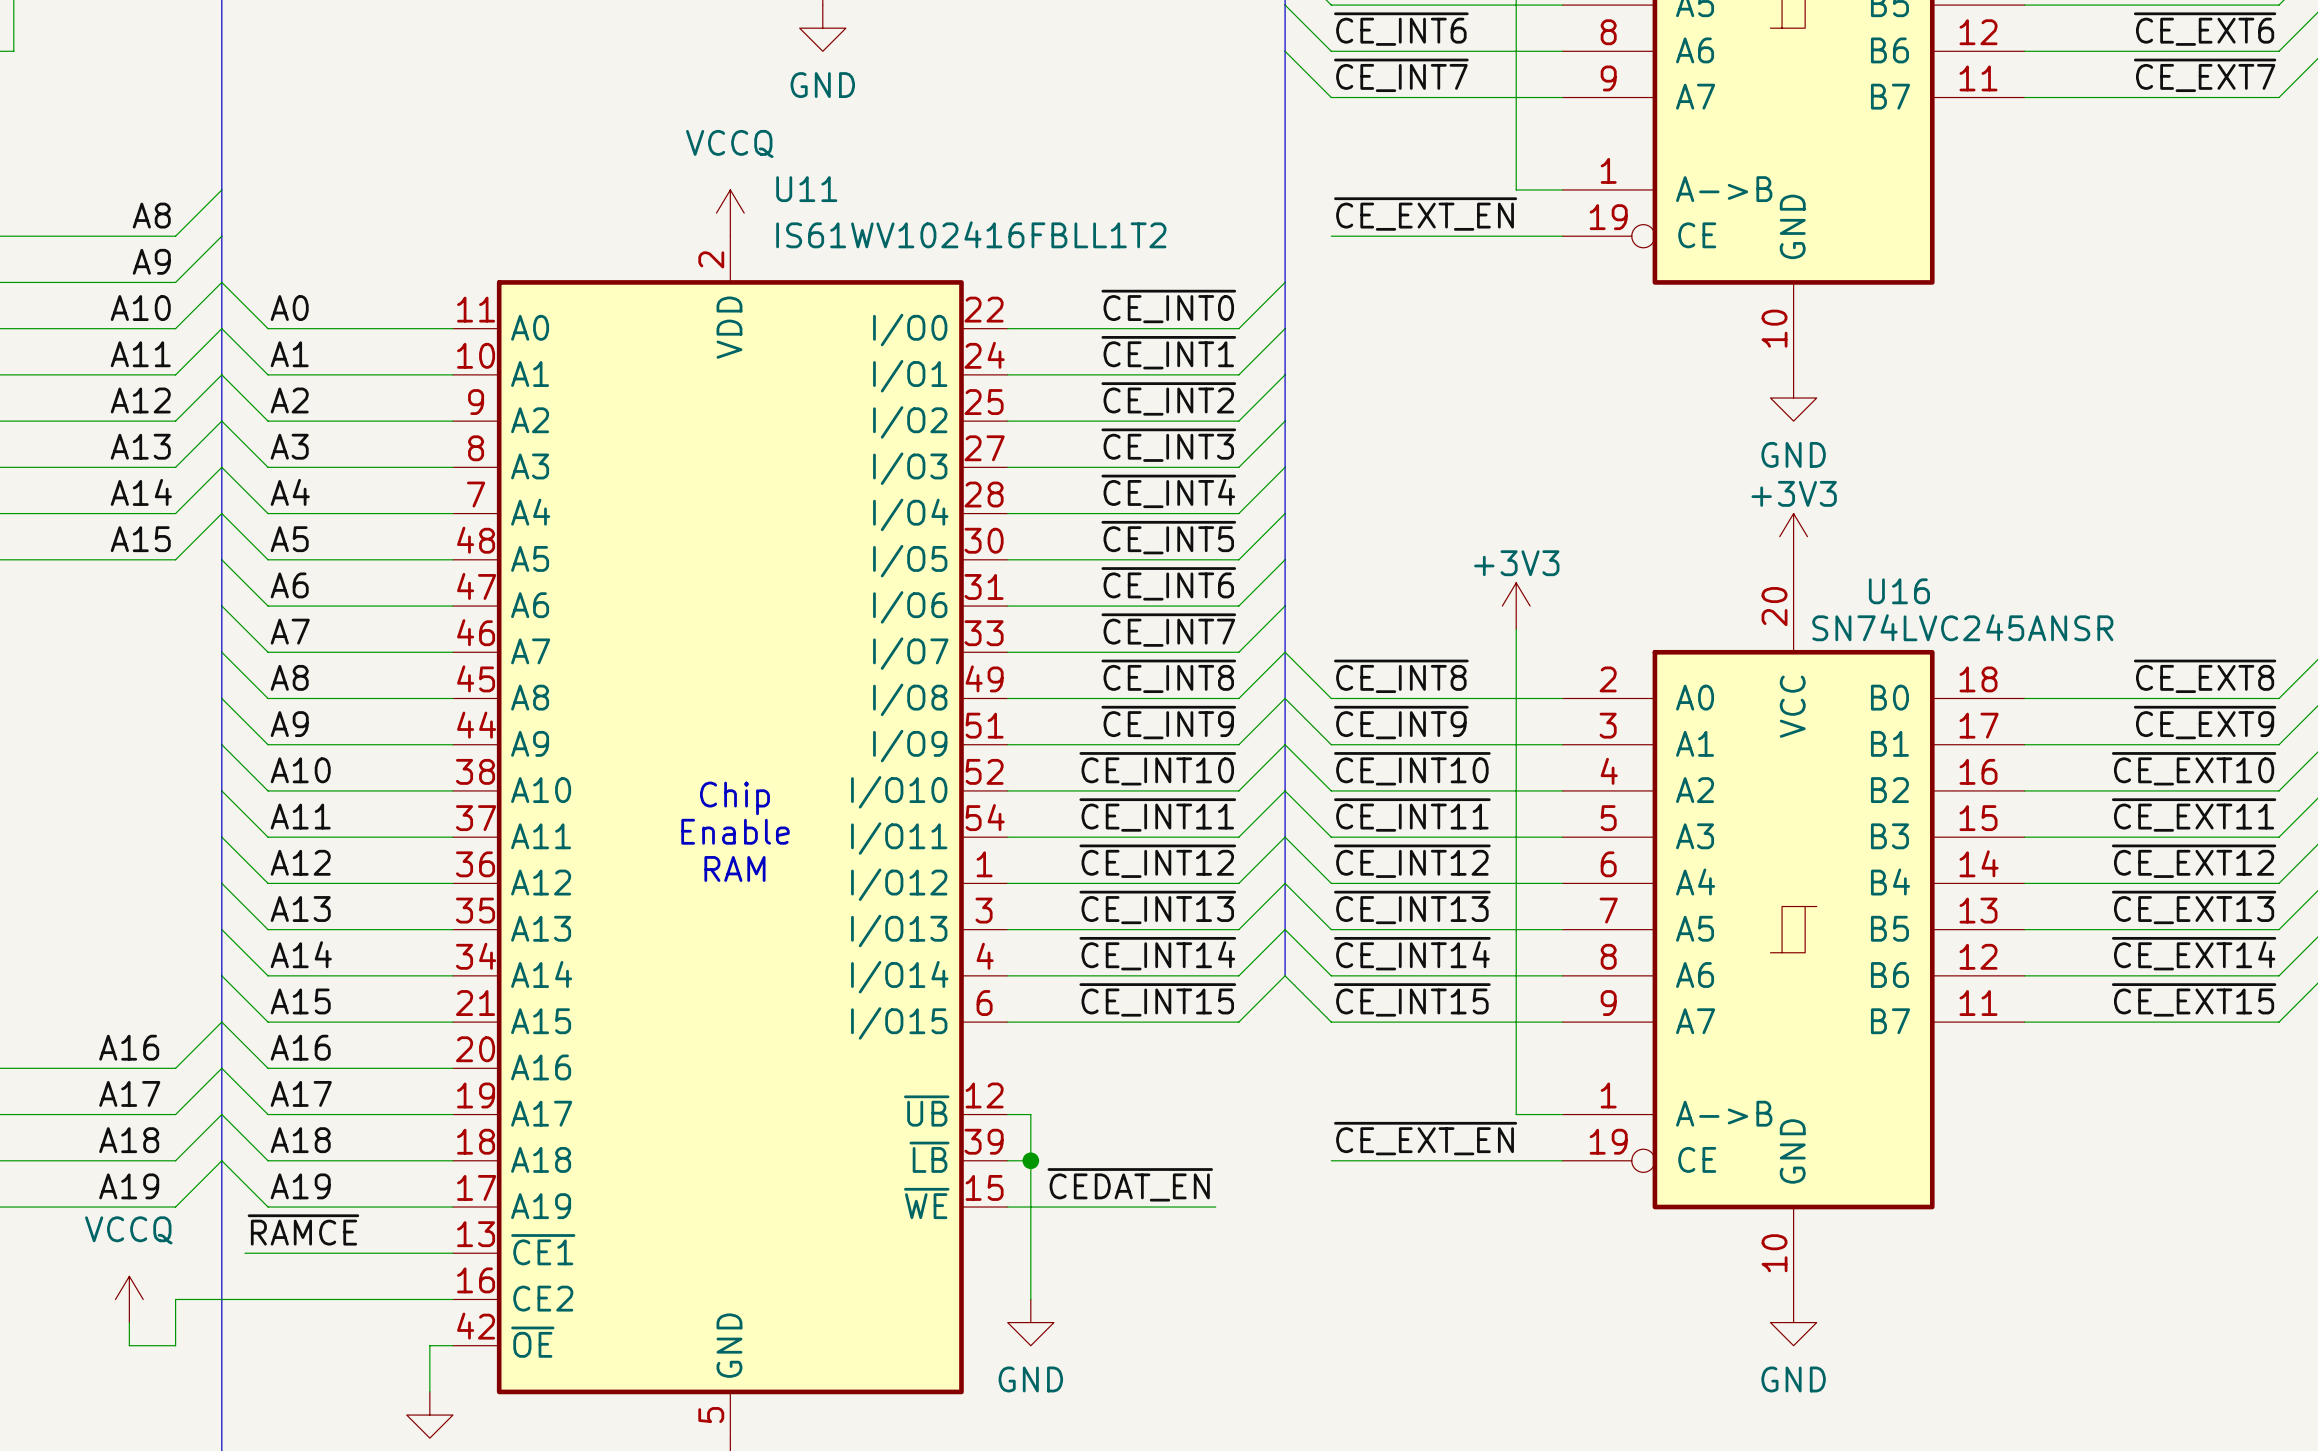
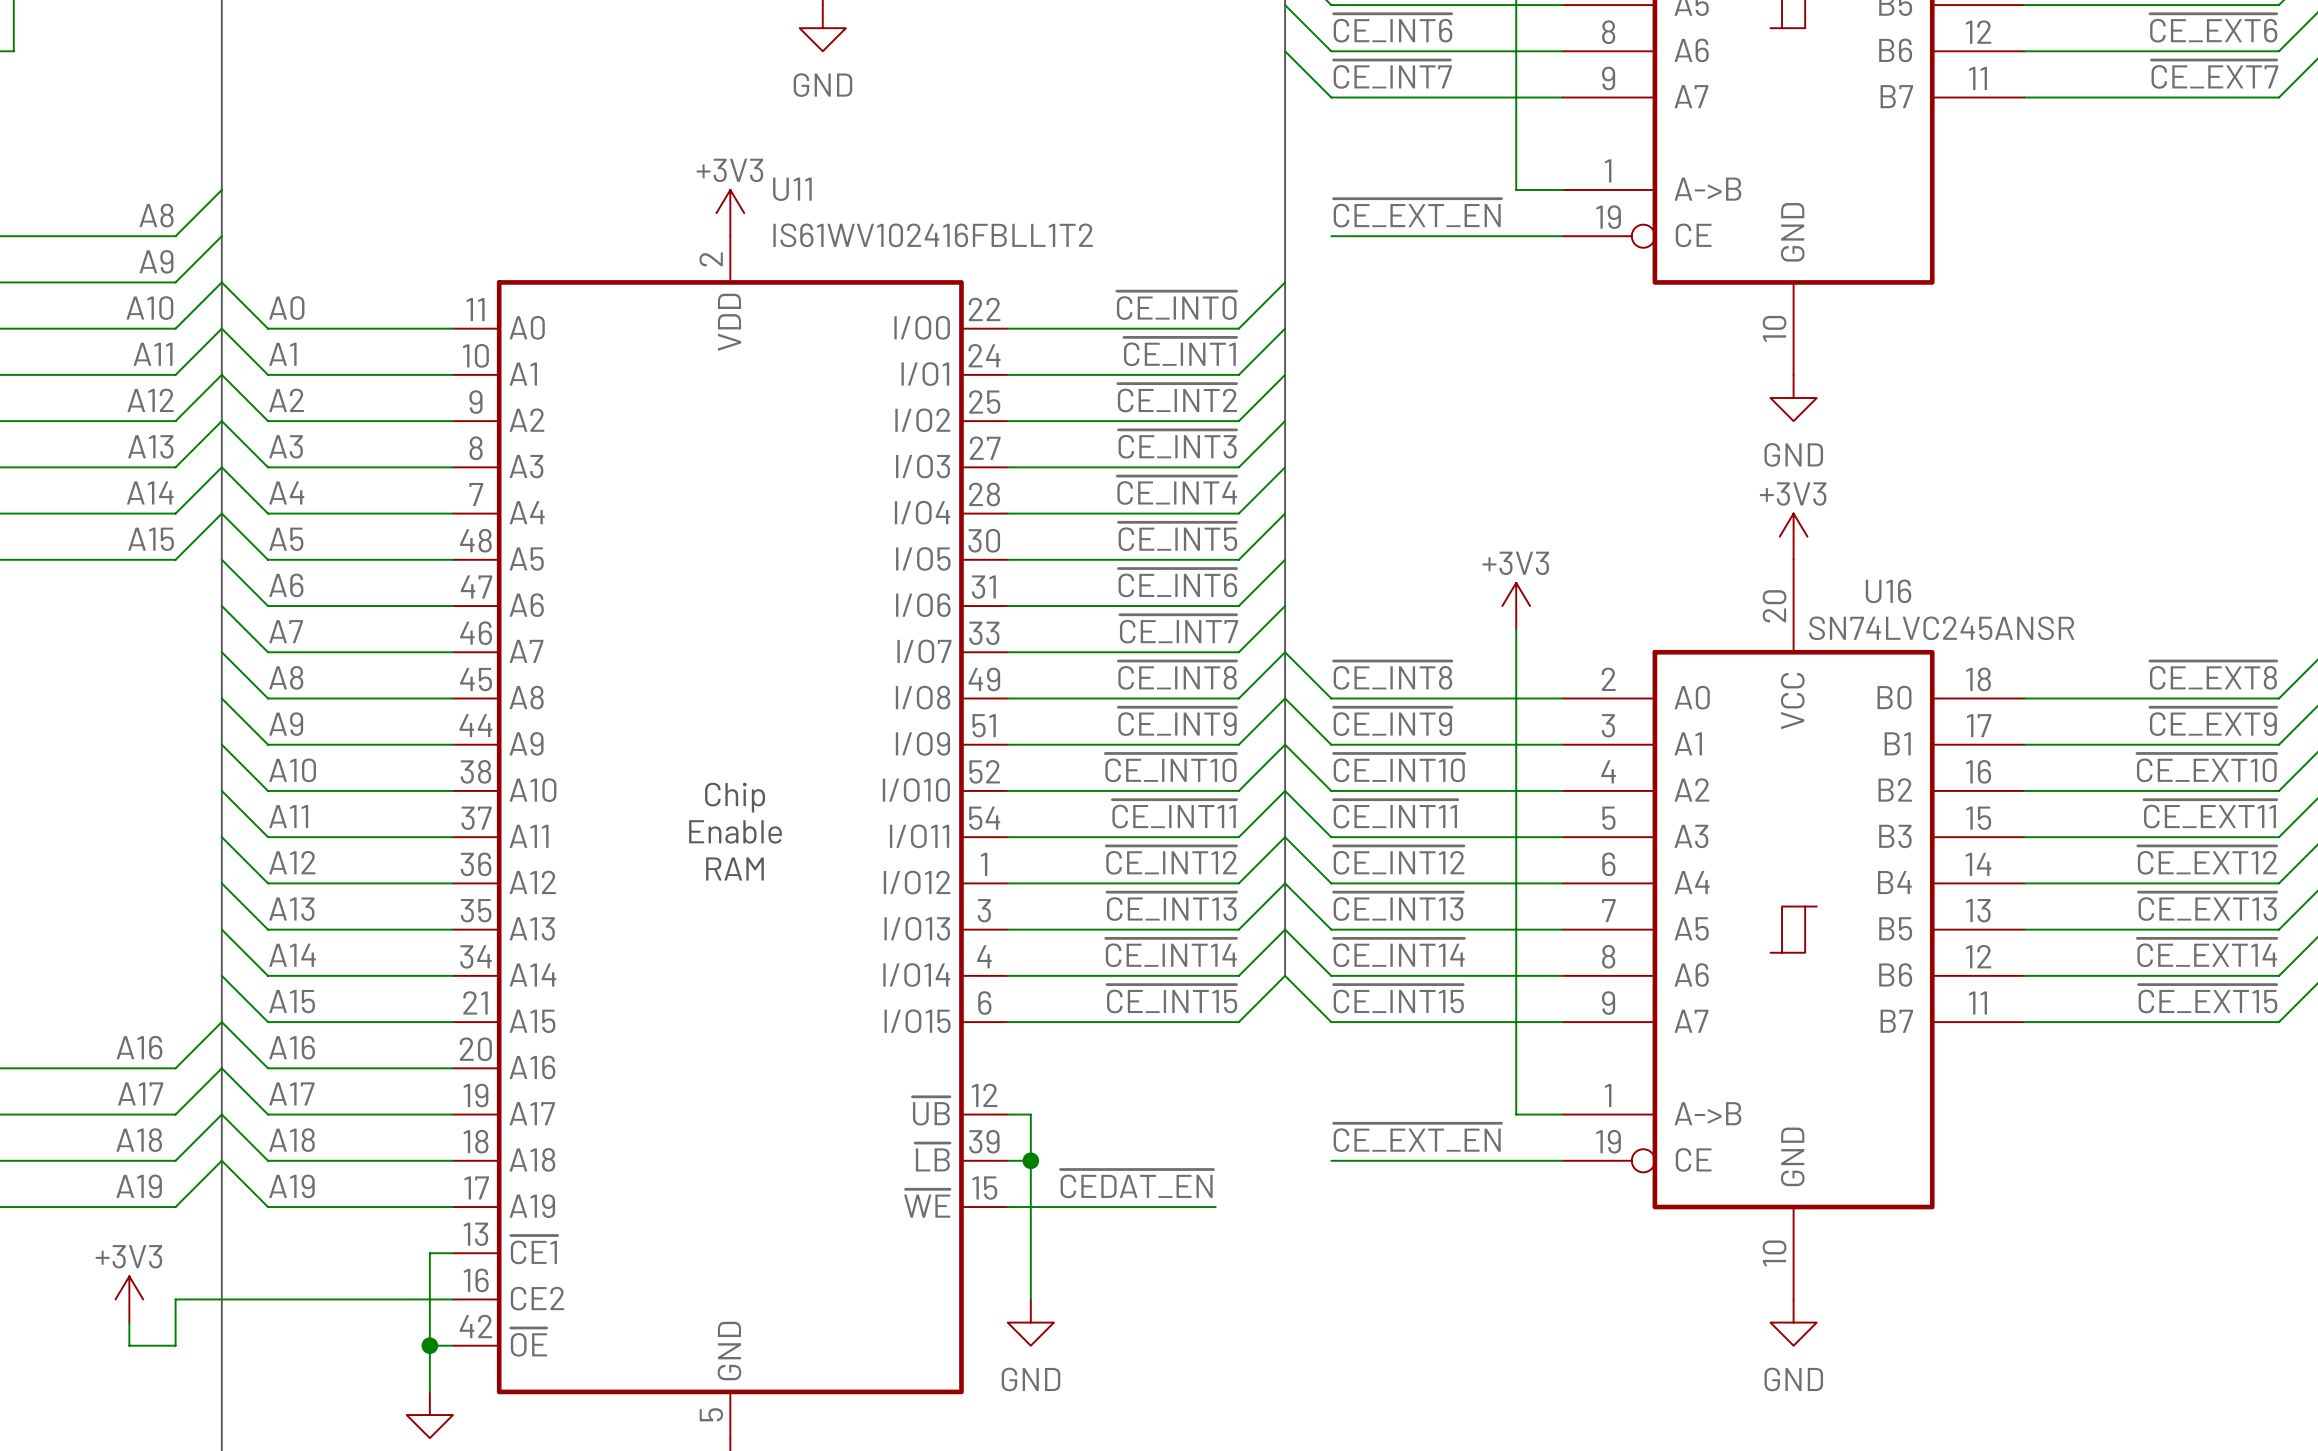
power symbol: VCCQ (730, 213) -> +3V3 (730, 213)
label: ~{RAMCE} (303, 1229) -> none
wire: (244, 1253) (429, 1253) -> (429, 1345) (429, 1253)
power symbol: VCCQ (129, 1299) -> +3V3 (129, 1299)
junction: none -> (429, 1345)

